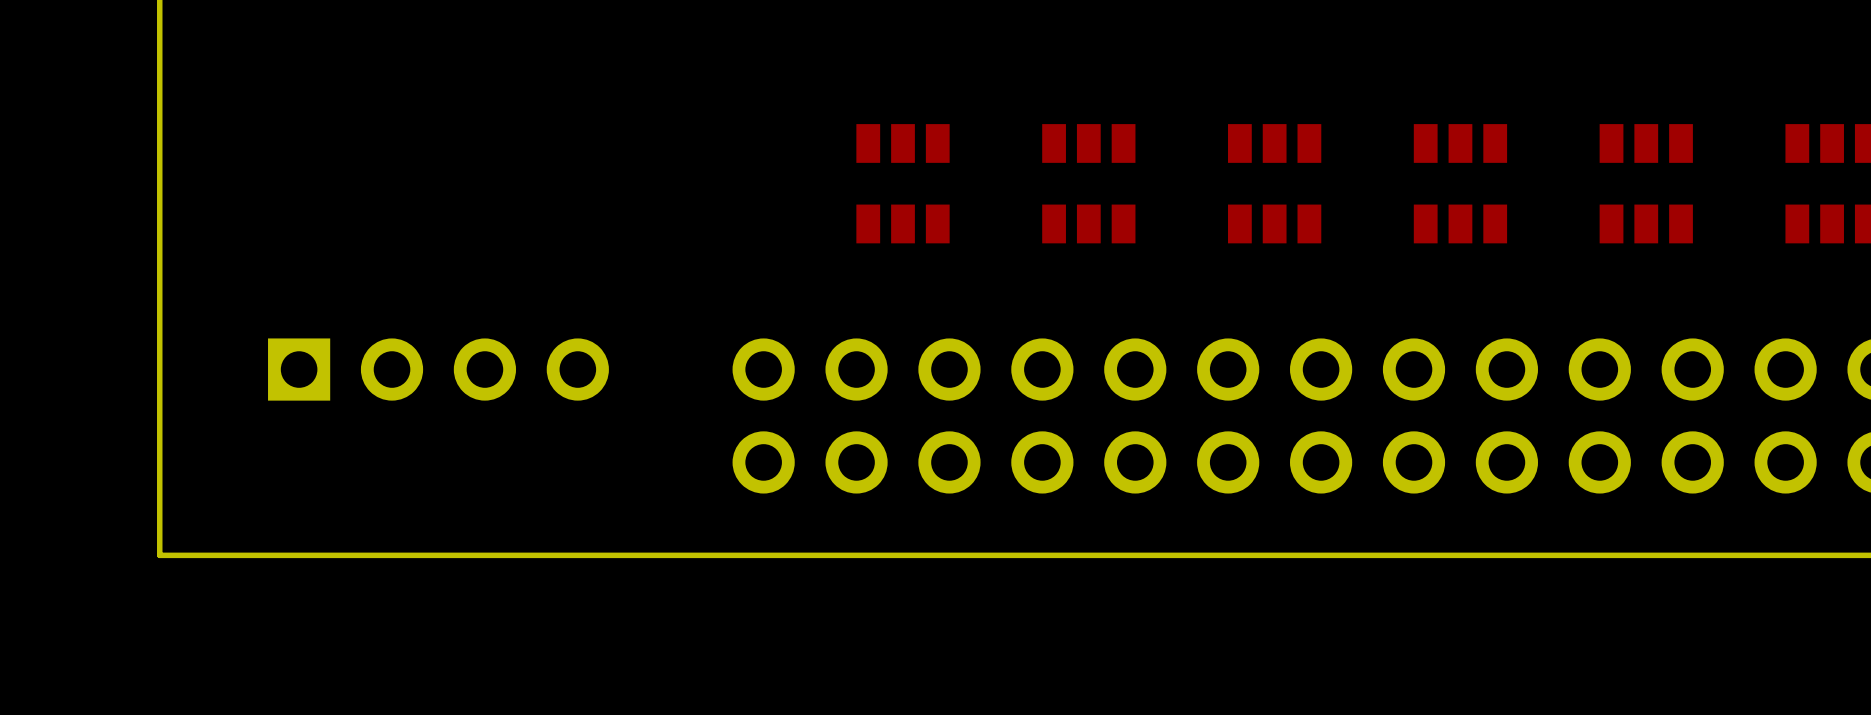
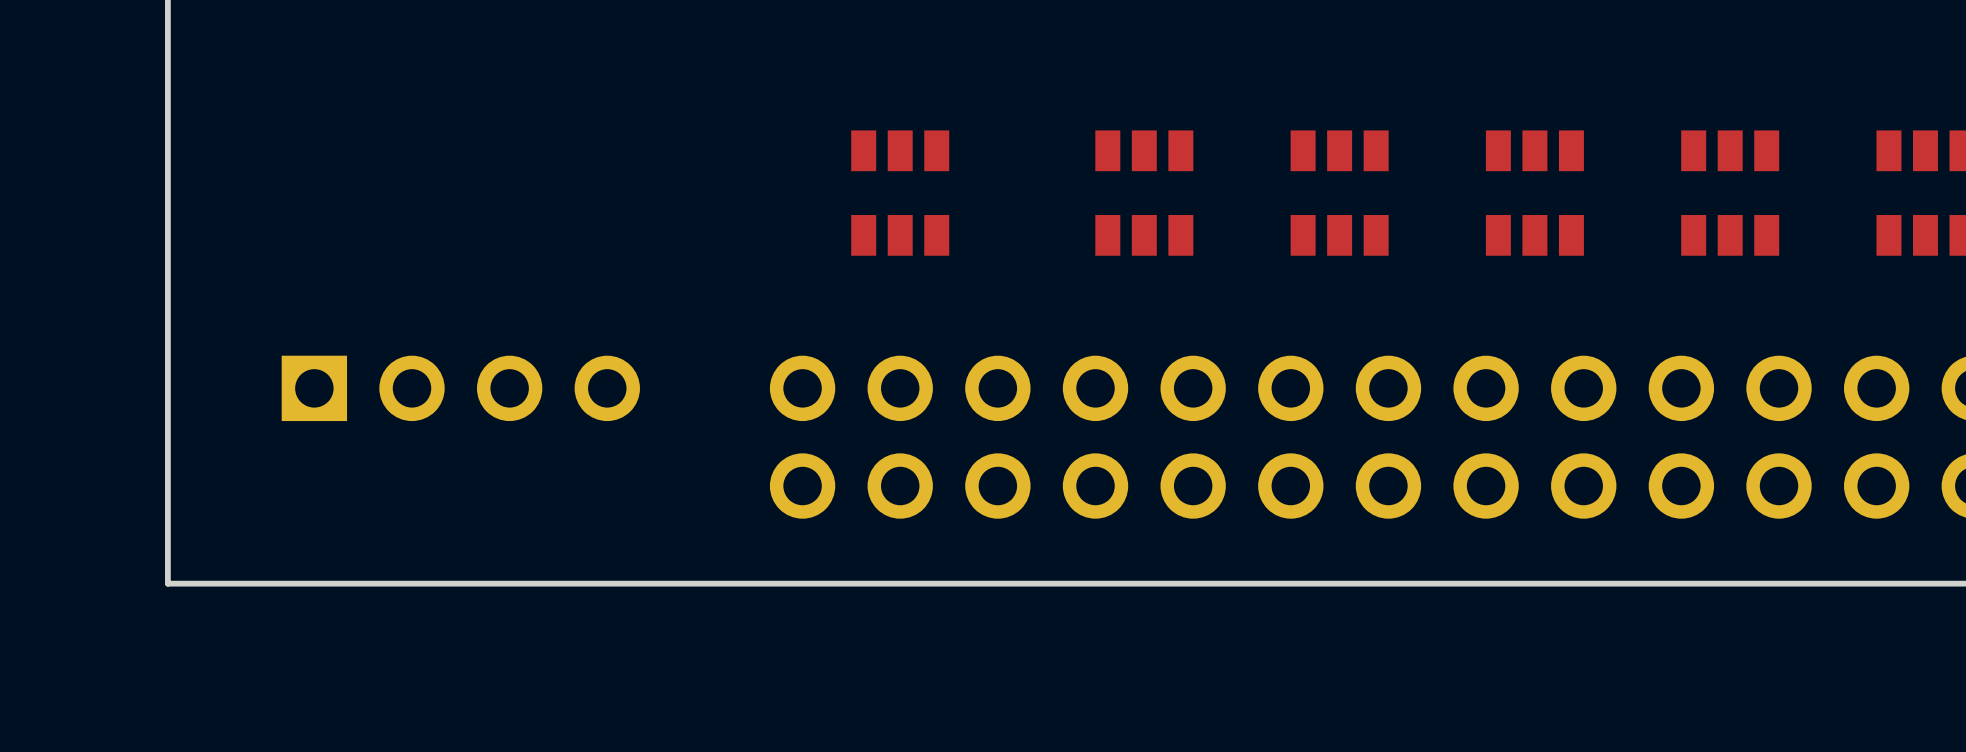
part position: (903, 183) -> (900, 193)

